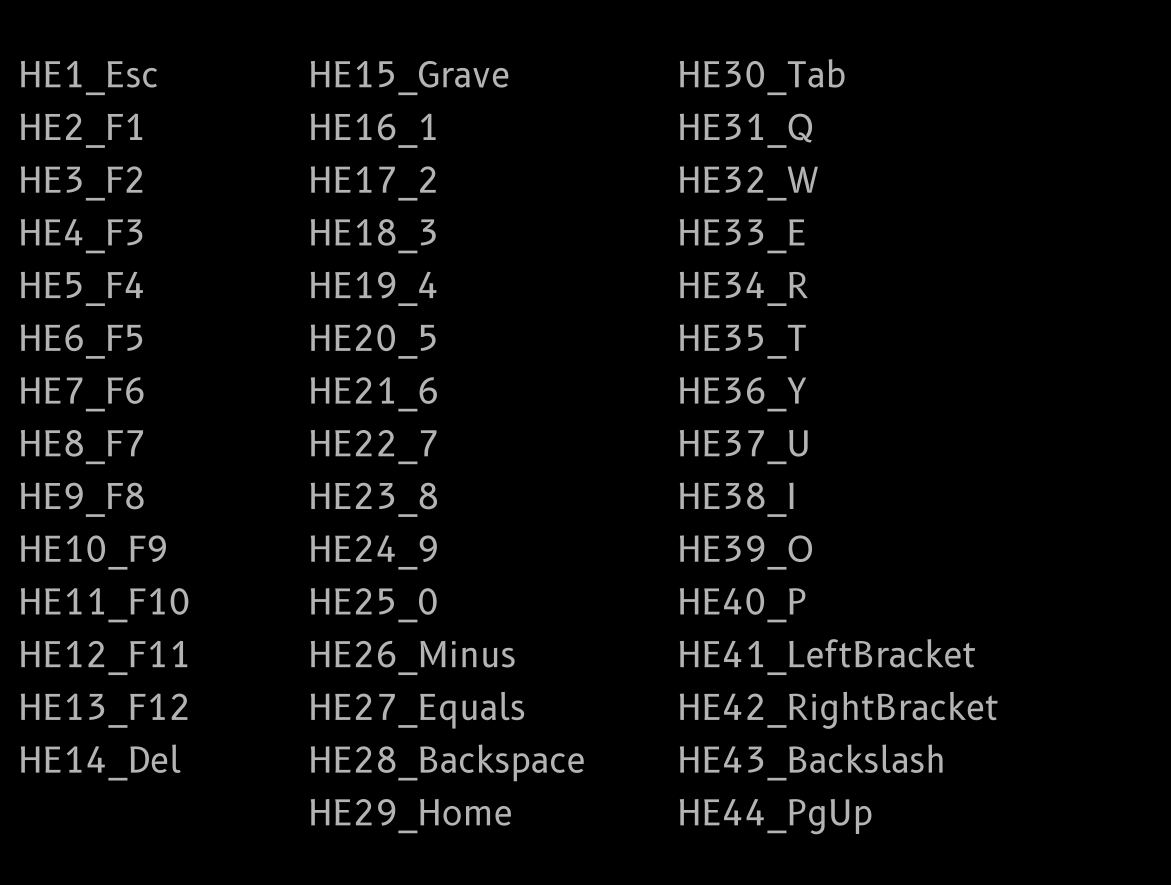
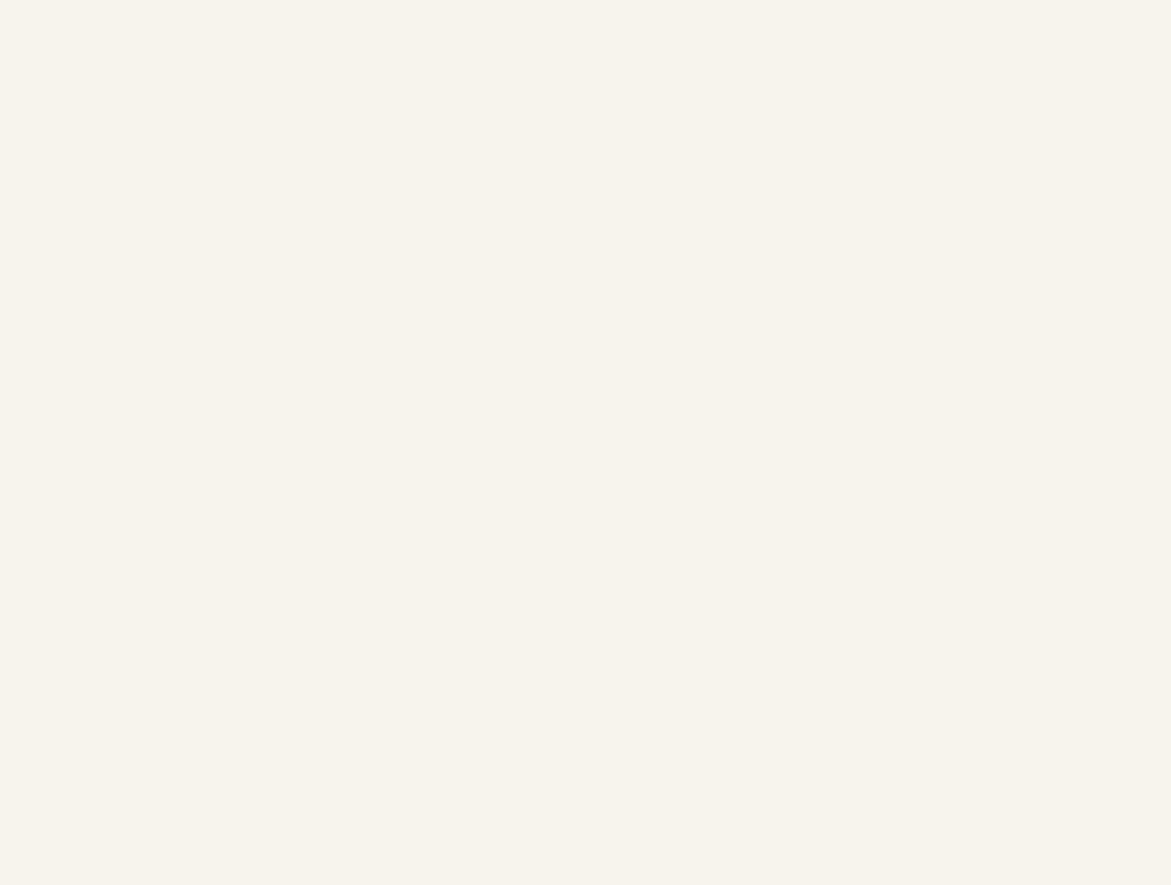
label: HE30_Tab (762, 77) -> none
label: HE1_Esc (88, 78) -> none
label: HE15_Grave (409, 78) -> none
label: HE2_F1 (81, 130) -> none
label: HE16_1 (373, 130) -> none
label: HE31_Q (745, 130) -> none
label: HE3_F2 (81, 183) -> none
label: HE17_2 (373, 183) -> none
label: HE32_W (748, 183) -> none
label: HE4_F3 (81, 236) -> none
label: HE18_3 (373, 236) -> none
label: HE33_E (742, 236) -> none
label: HE5_F4 (81, 288) -> none
label: HE19_4 (373, 288) -> none
label: HE34_R (743, 288) -> none
label: HE6_F5 (81, 341) -> none
label: HE20_5 (373, 341) -> none
label: HE35_T (742, 341) -> none
label: HE7_F6 (82, 394) -> none
label: HE21_6 (373, 394) -> none
label: HE36_Y (743, 394) -> none
label: HE8_F7 (81, 447) -> none
label: HE22_7 (373, 447) -> none
label: HE37_U (743, 447) -> none
label: HE9_F8 (82, 499) -> none
label: HE23_8 (373, 499) -> none
label: HE38_I (736, 499) -> none
label: HE10_F9 (93, 552) -> none
label: HE24_9 (373, 552) -> none
label: HE39_O (745, 552) -> none
label: HE11_F10 (104, 605) -> none
label: HE25_0 (373, 605) -> none
label: HE40_P (742, 605) -> none
label: HE12_F11 (104, 657) -> none
label: HE26_Minus (412, 657) -> none
label: HE41_LeftBracket (827, 657) -> none
label: HE13_F12 (104, 710) -> none
label: HE27_Equals (417, 710) -> none
label: HE42_RightBracket (838, 710) -> none
label: HE14_Del (100, 762) -> none
label: HE28_Backspace (447, 762) -> none
label: HE43_Backslash (811, 762) -> none
label: HE29_Home (410, 816) -> none
label: HE44_PgUp (775, 816) -> none

